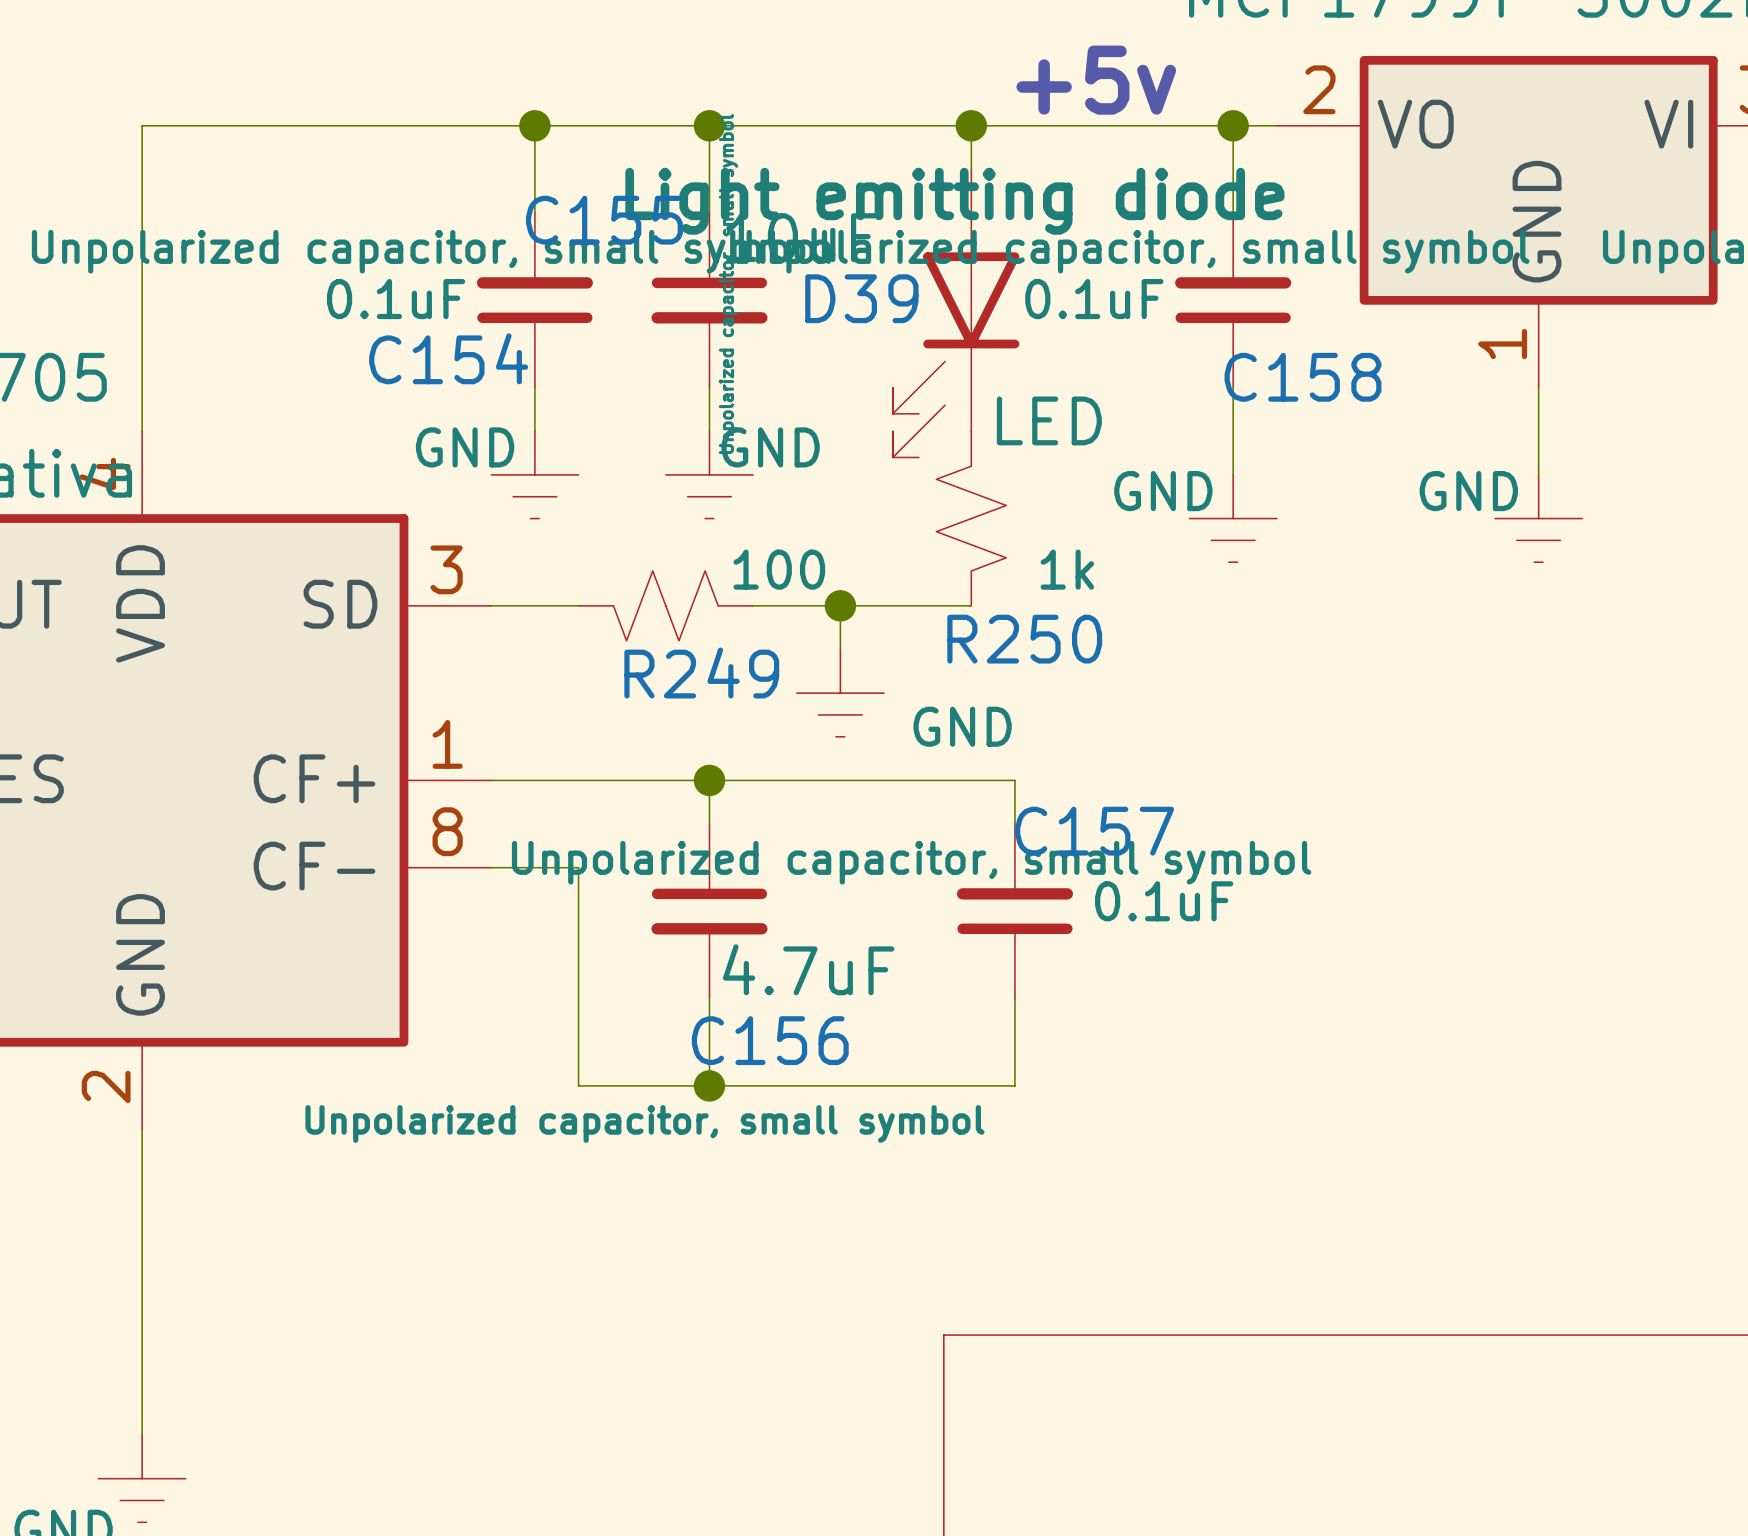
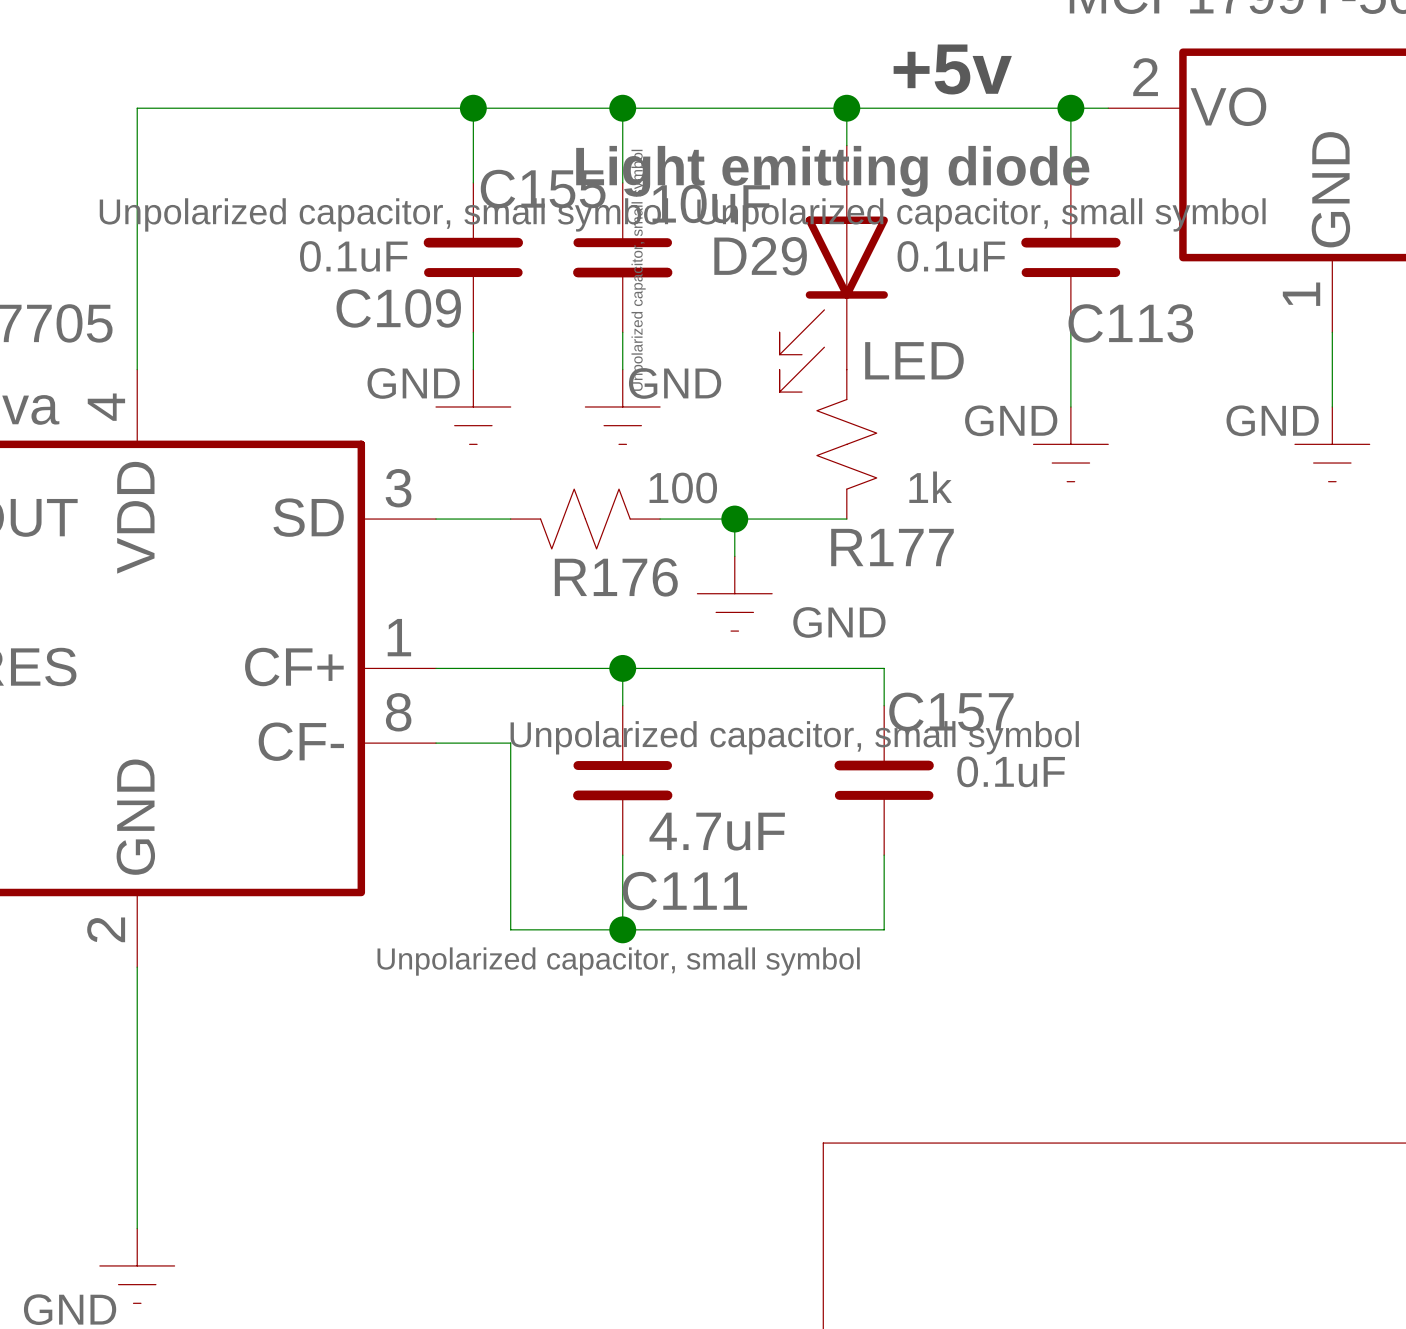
D39 name: D39 (861, 298) -> D29 (760, 256)
C154 name: C154 (448, 358) -> C109 (398, 308)
C158 name: C158 (1302, 377) -> C113 (1130, 323)
R250 name: R250 (1024, 639) -> R177 (892, 547)
R249 name: R249 (701, 673) -> R176 (616, 577)
C156 name: C156 (770, 1040) -> C111 (684, 891)

